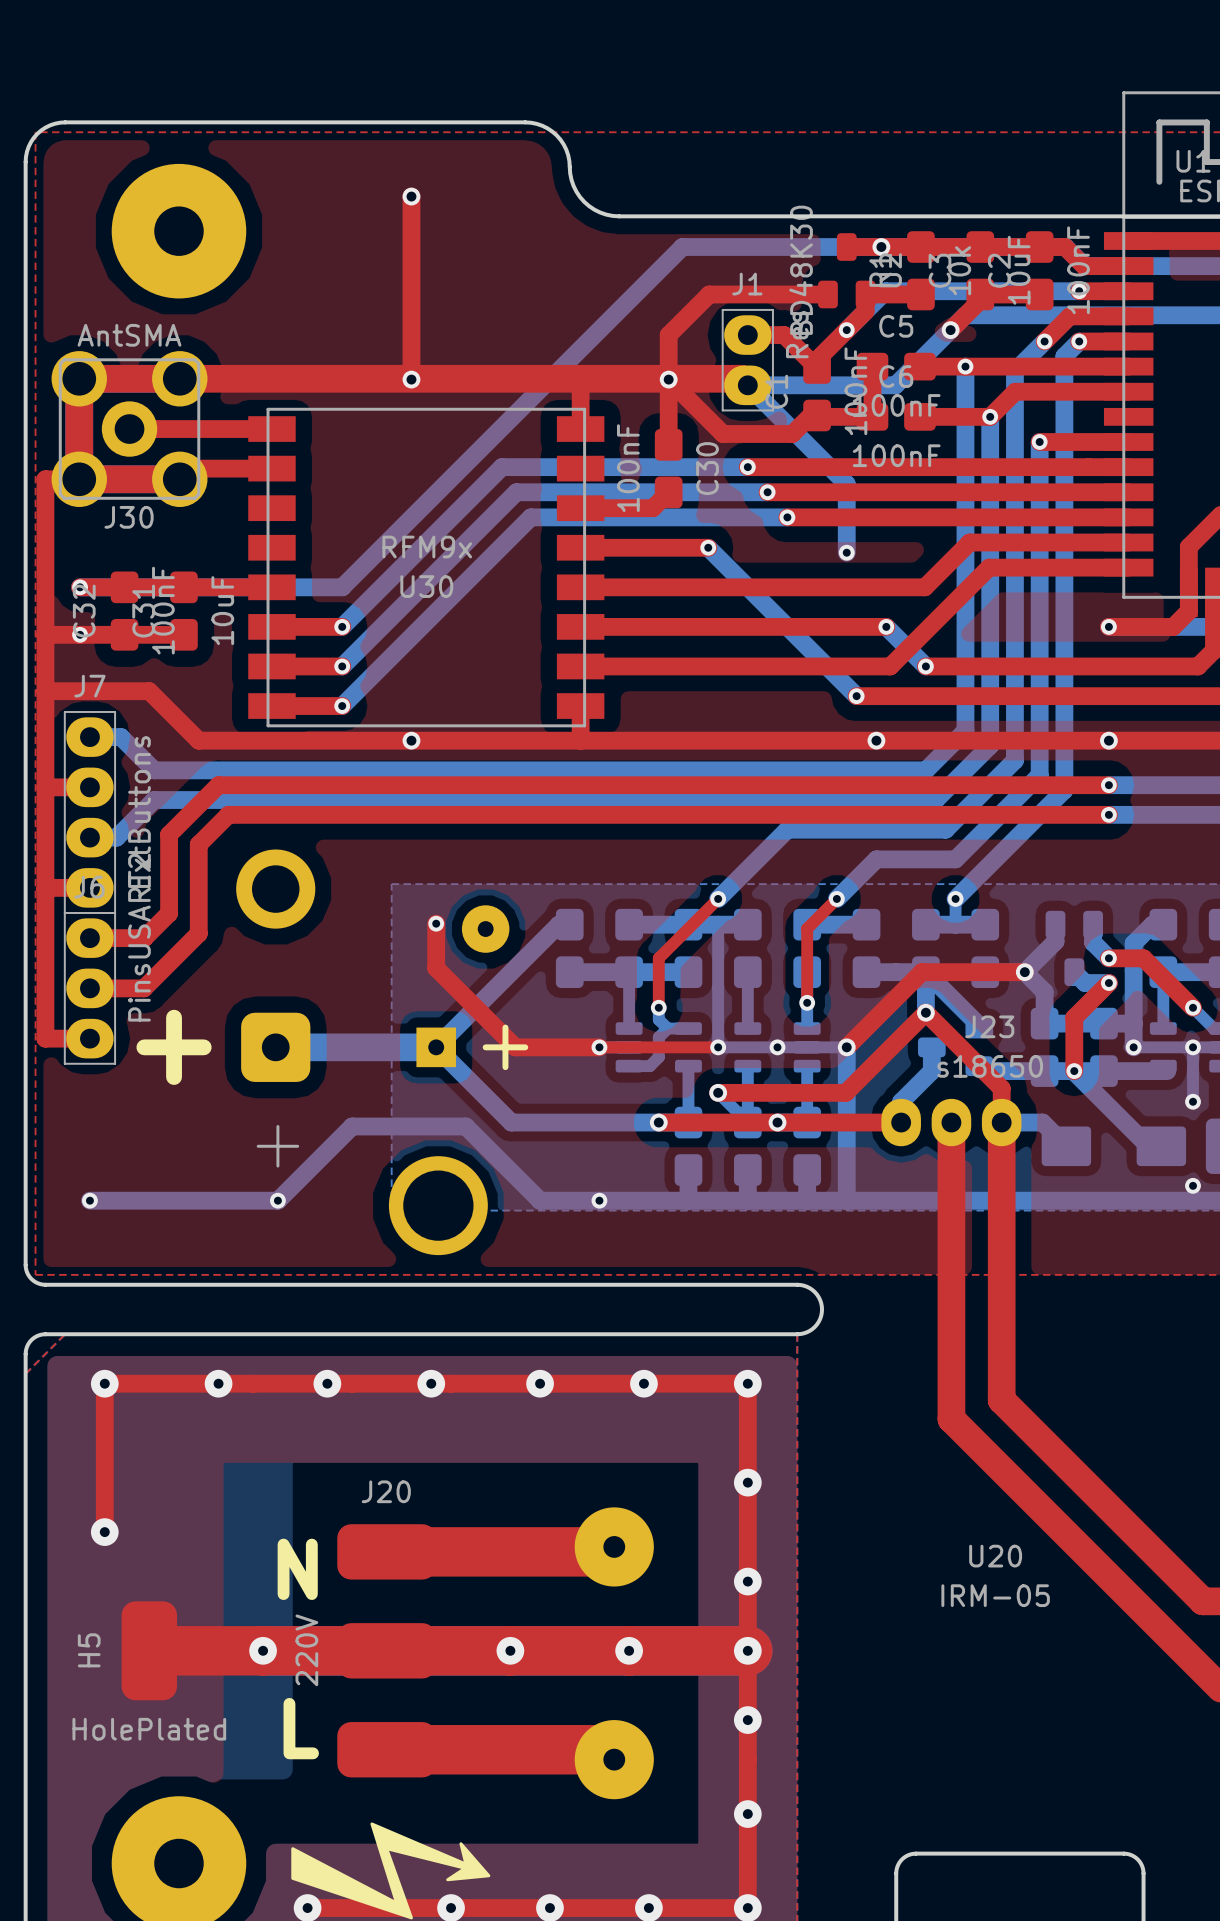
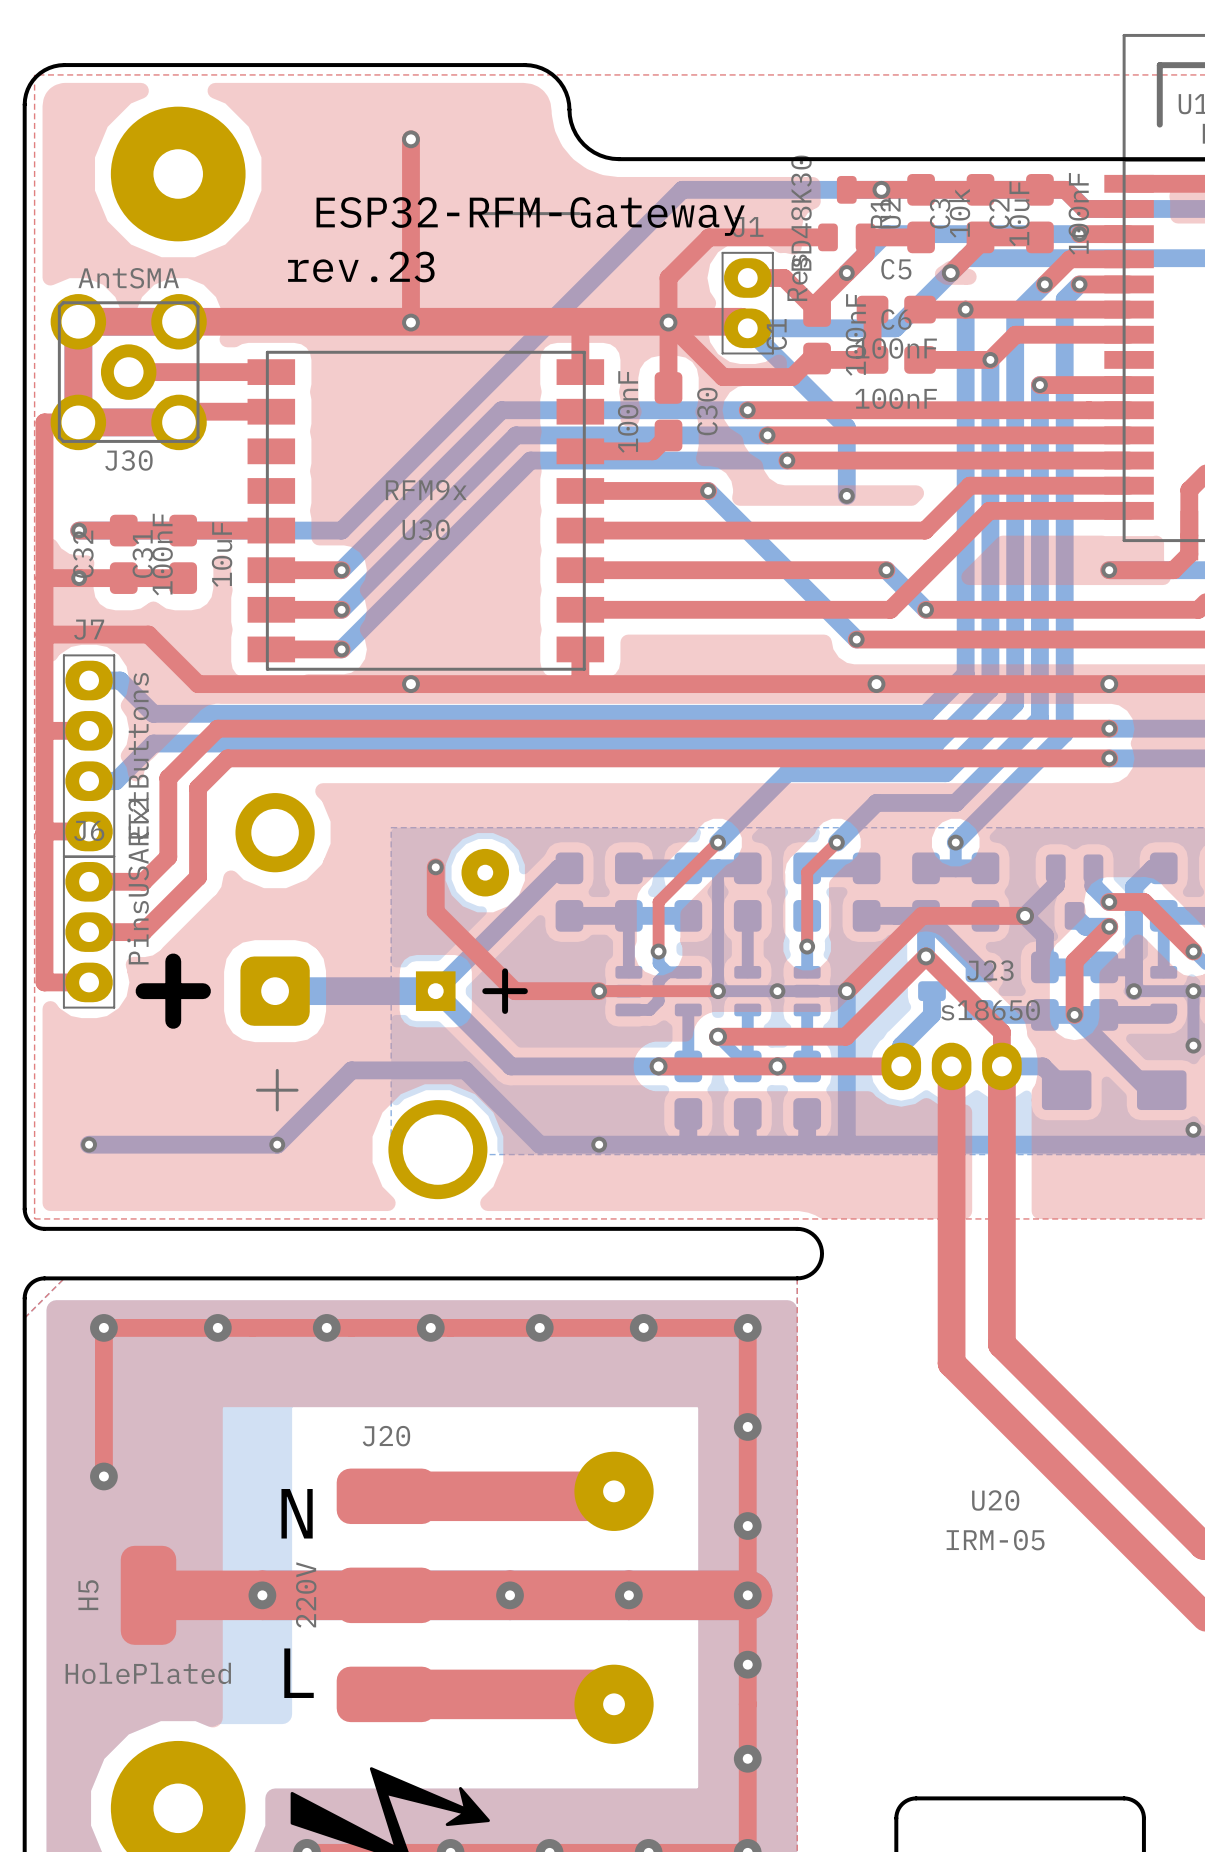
drawing: none -> [478, 212, 581, 216]
text: none -> rev.23 (361, 266)

